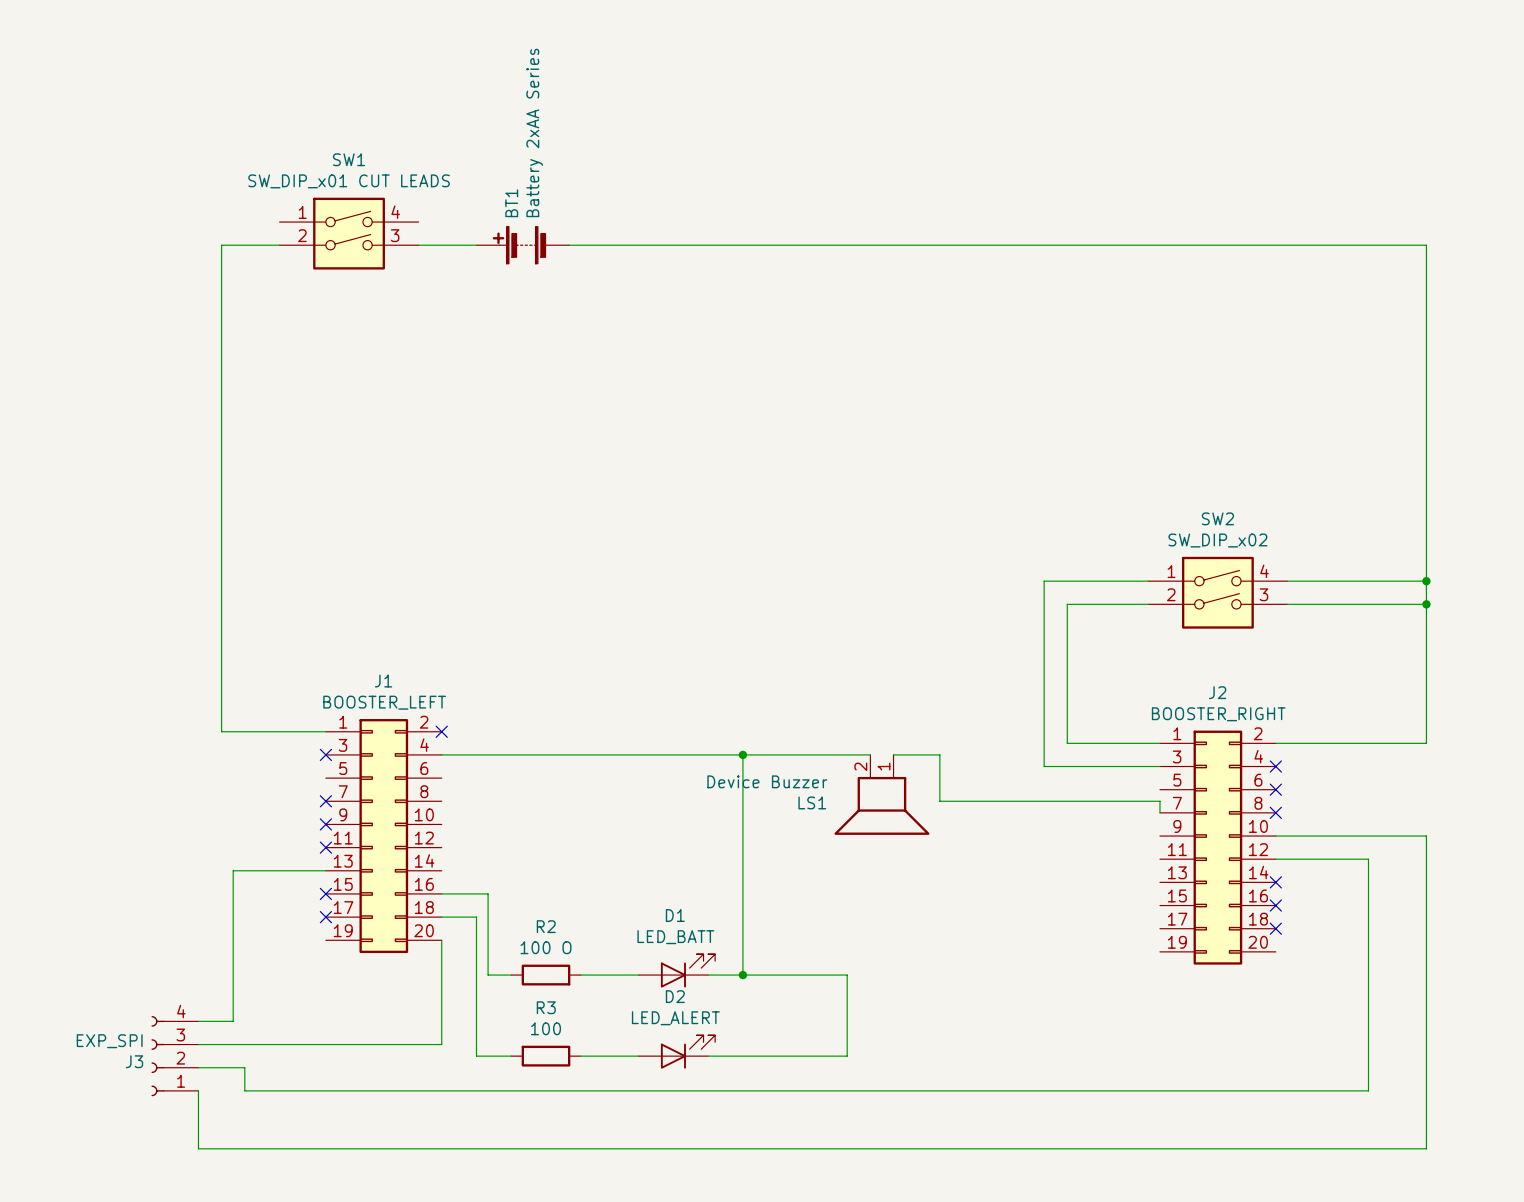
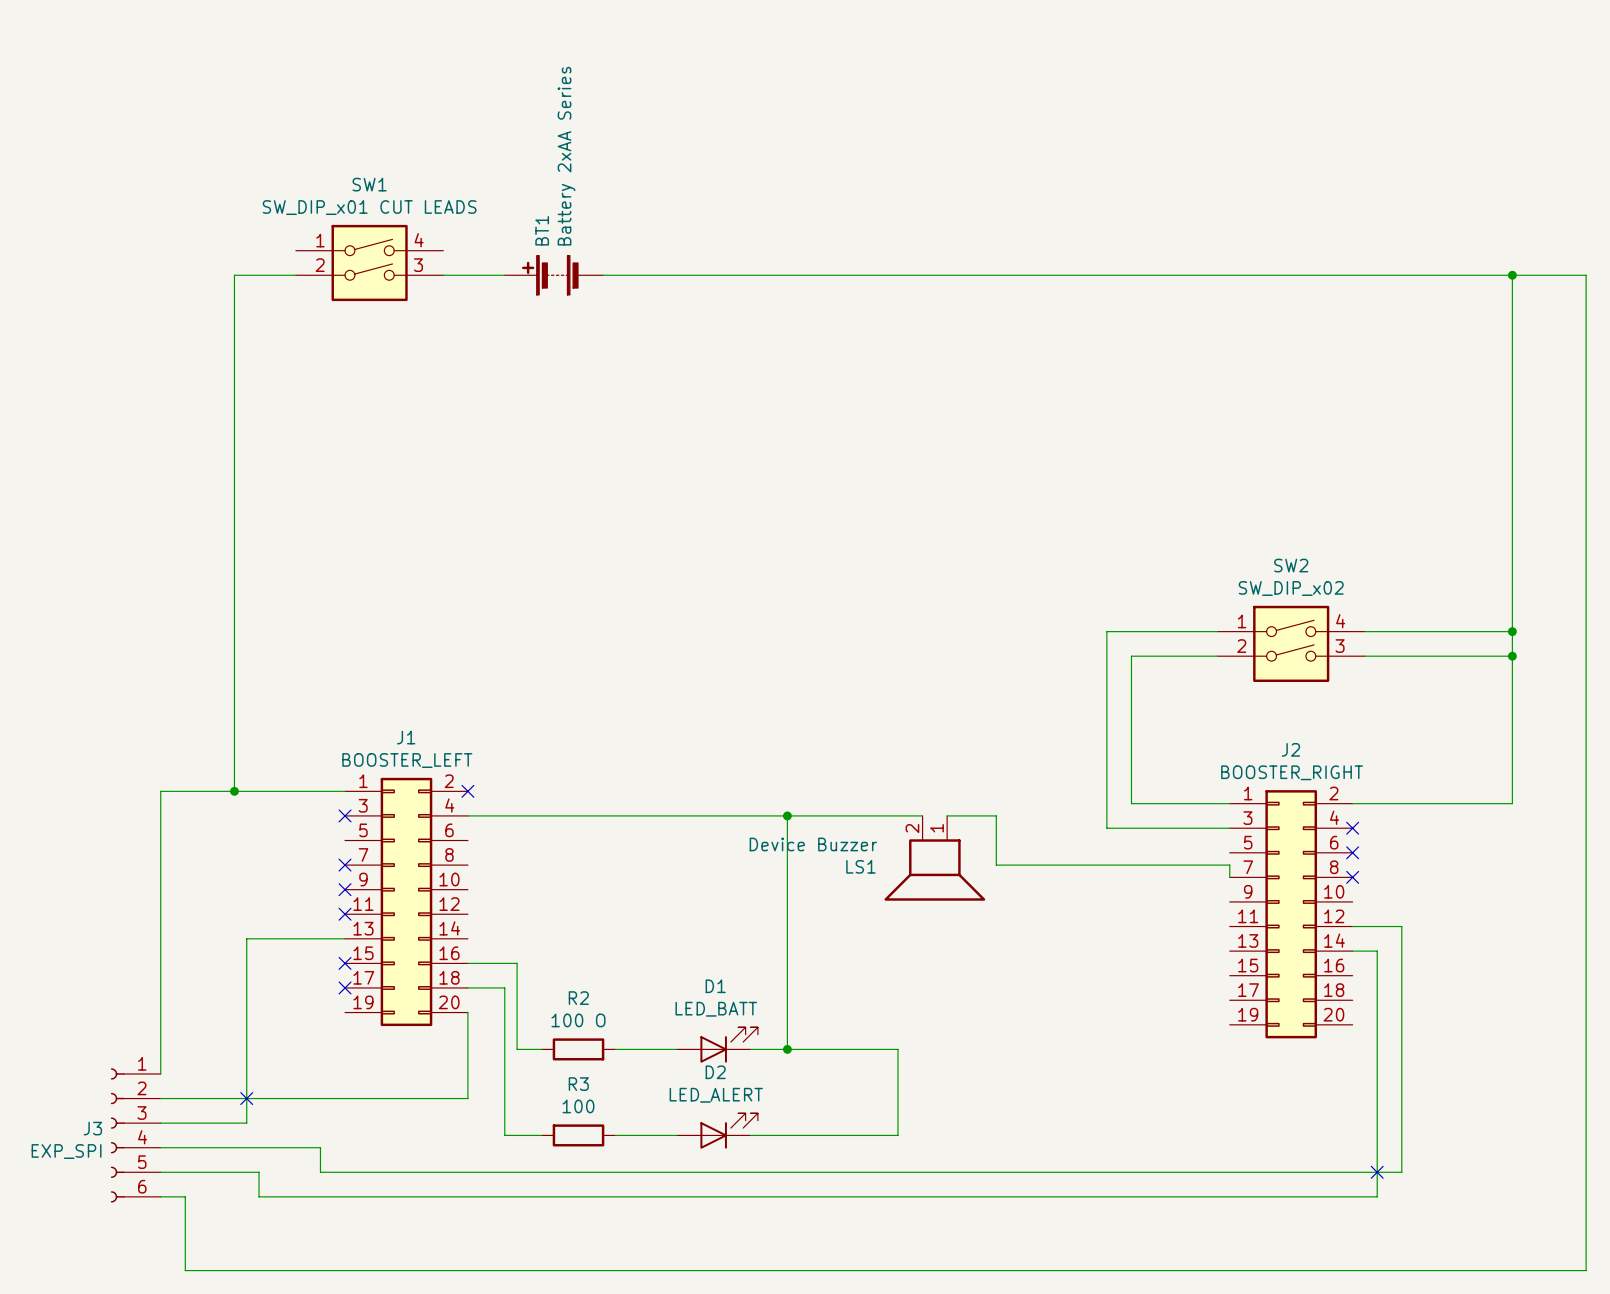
wire: none -> (1512, 275) (1586, 275) (1586, 1270) (185, 1270) (185, 1196) (160, 1196)
junction: none -> (1512, 275)
wire: none -> (234, 791) (160, 791) (160, 1073)
junction: none -> (234, 791)
wire: (1275, 836) (1426, 836) (1426, 1148) (198, 1148) (198, 1090) -> none
wire: (1322, 859) (1368, 859) (1368, 1090) (1322, 1090) -> (1401, 926) (1401, 1172)
wire: none -> (1352, 951) (1377, 951) (1377, 1196) (259, 1196) (259, 1172) (160, 1172)
no-connect mark: (1275, 882) -> none
no-connect mark: (1275, 905) -> none
no-connect mark: (1275, 928) -> none
J3 symbol: [151, 1016, 199, 1097] -> [110, 1068, 161, 1203]
no-connect mark: none -> (246, 1098)
wire: (441, 1021) (441, 1044) (233, 1044) -> (467, 1098) (246, 1098) (246, 1123)
J3 value position: EXP_SPI (109, 1041) -> EXP_SPI (66, 1151)
wire: (244, 1067) (244, 1090) (302, 1090) -> (259, 1147) (320, 1147) (320, 1172)
no-connect mark: none -> (1377, 1172)

